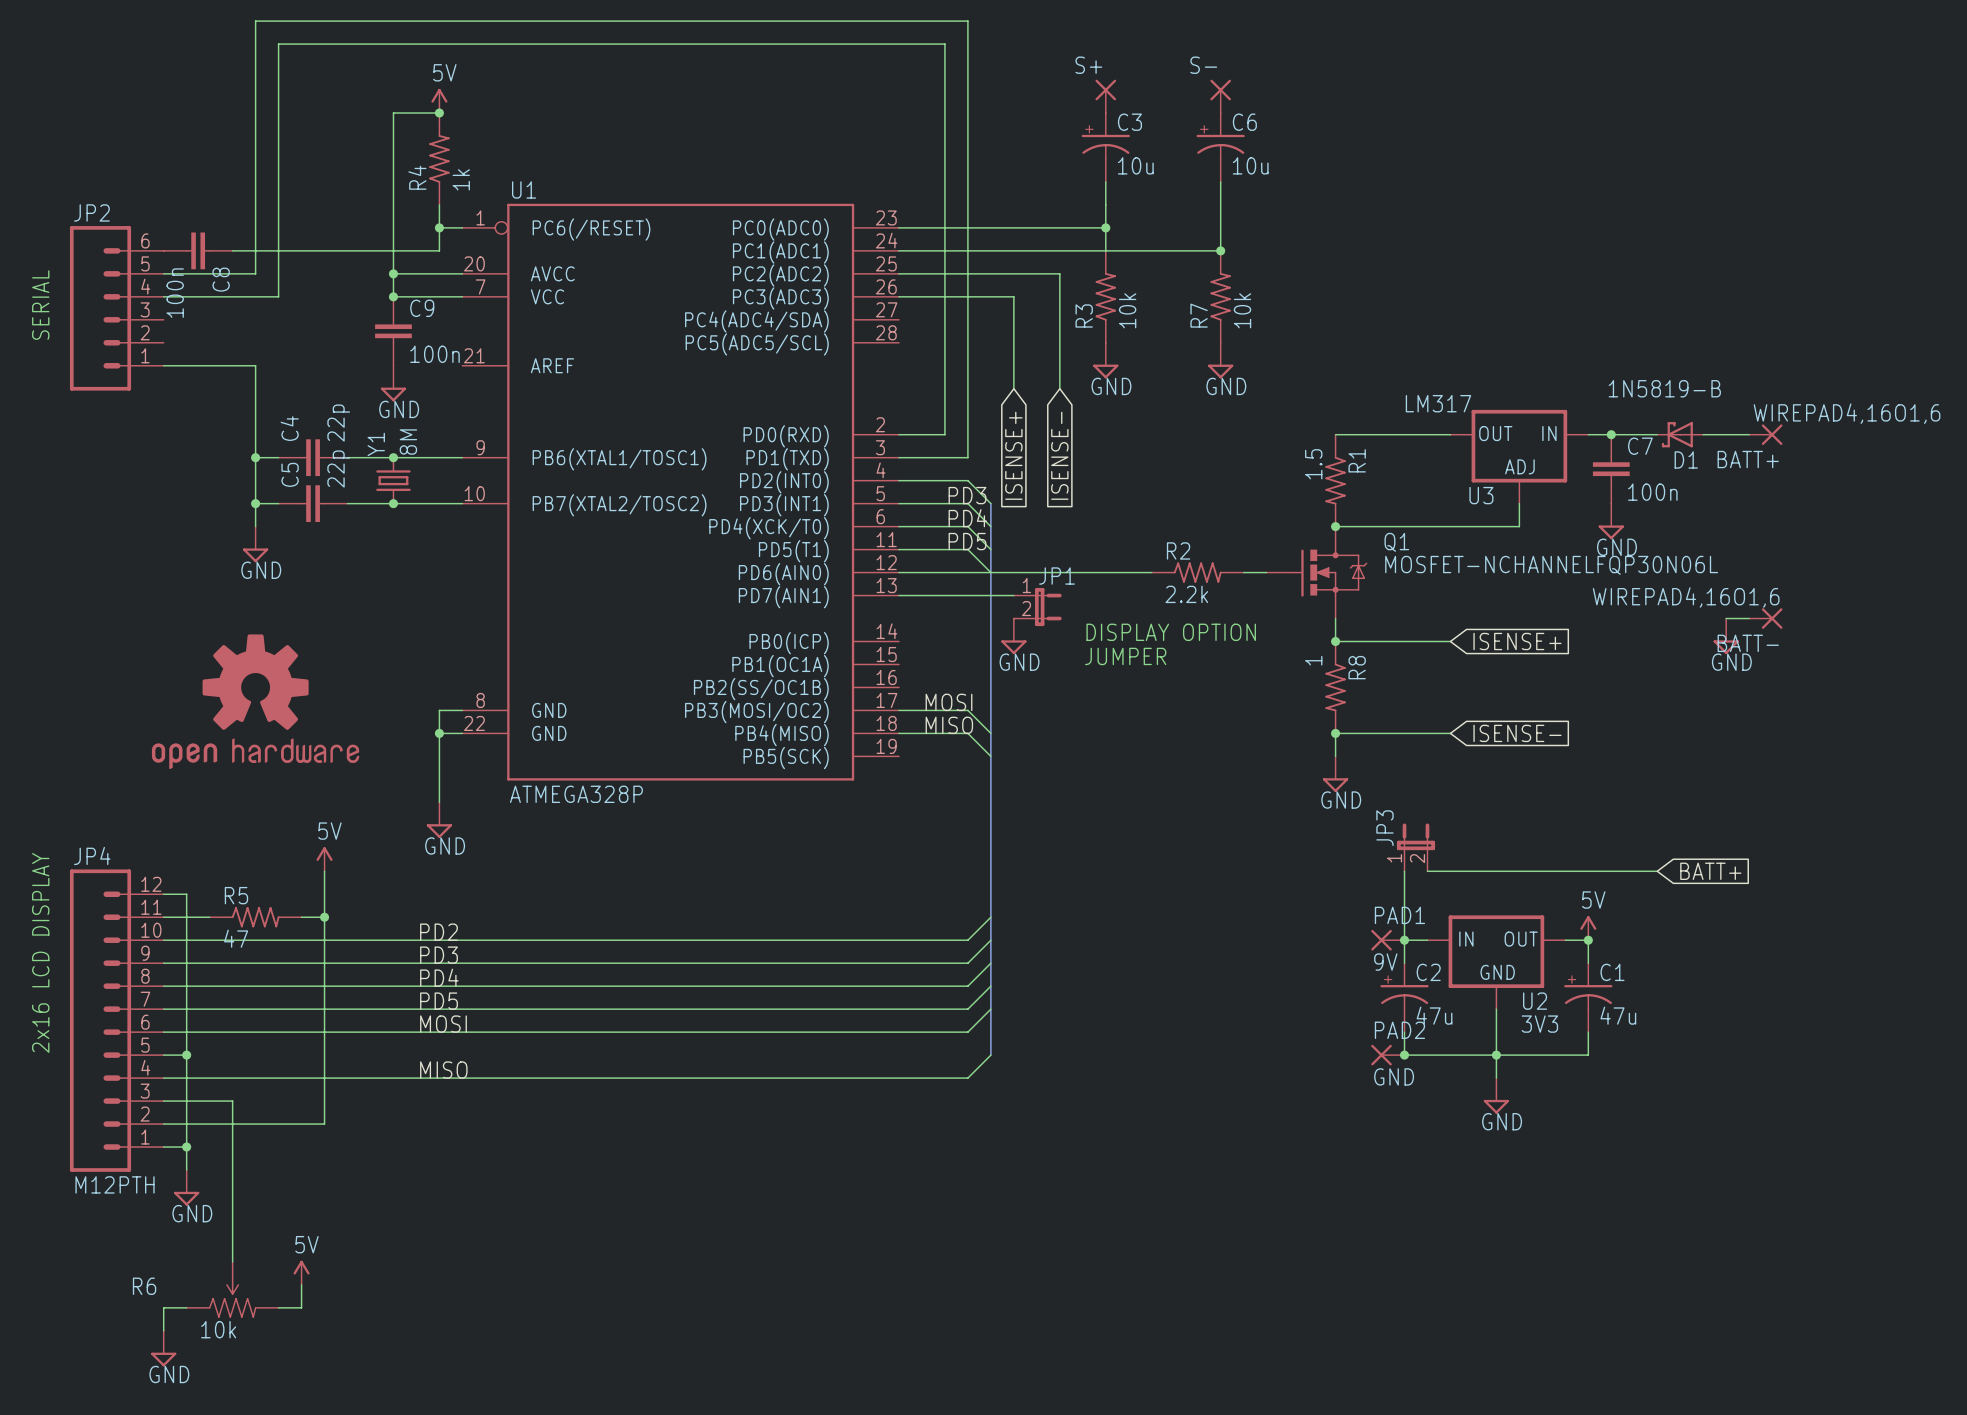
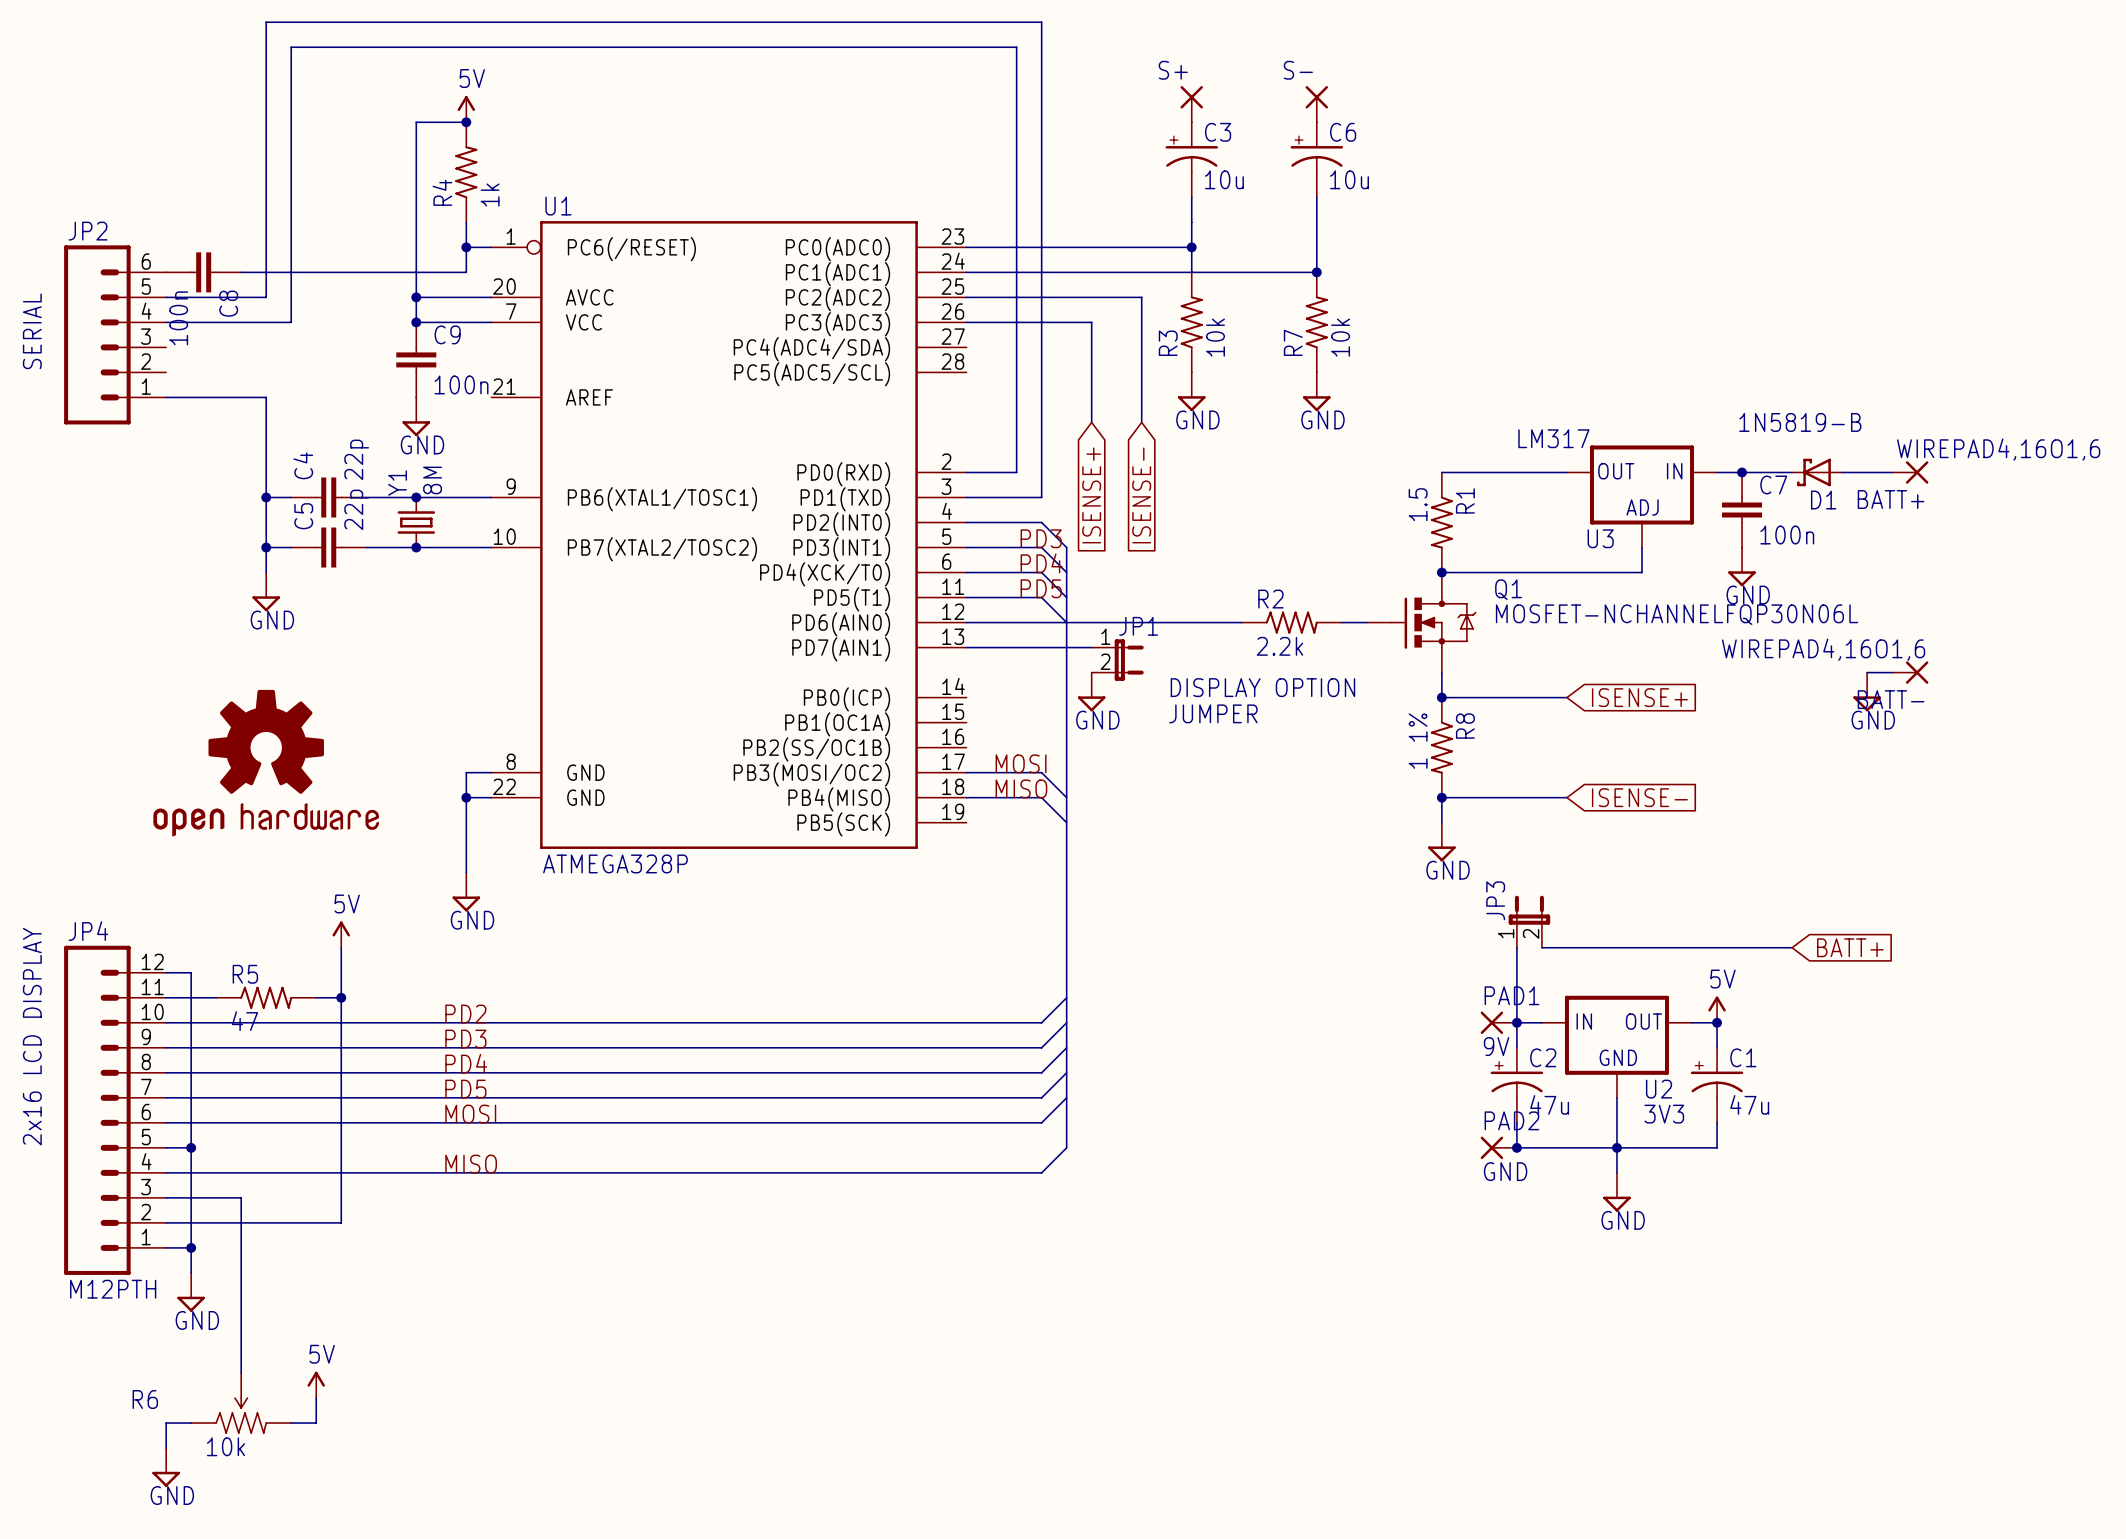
R8 value: 1 (1313, 660) -> 1 1% (1418, 741)

